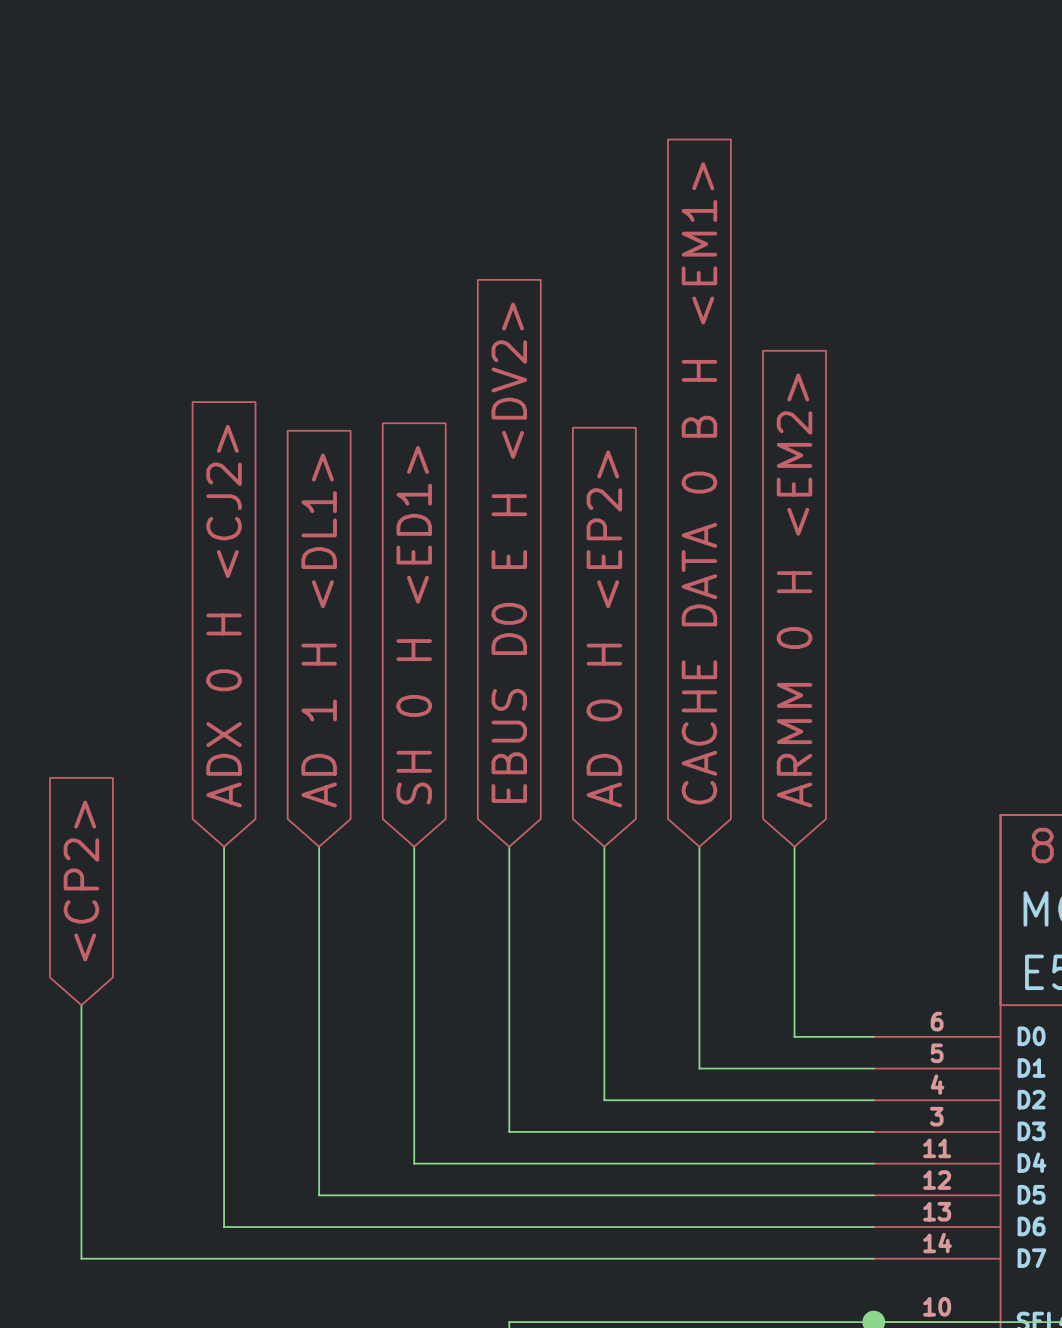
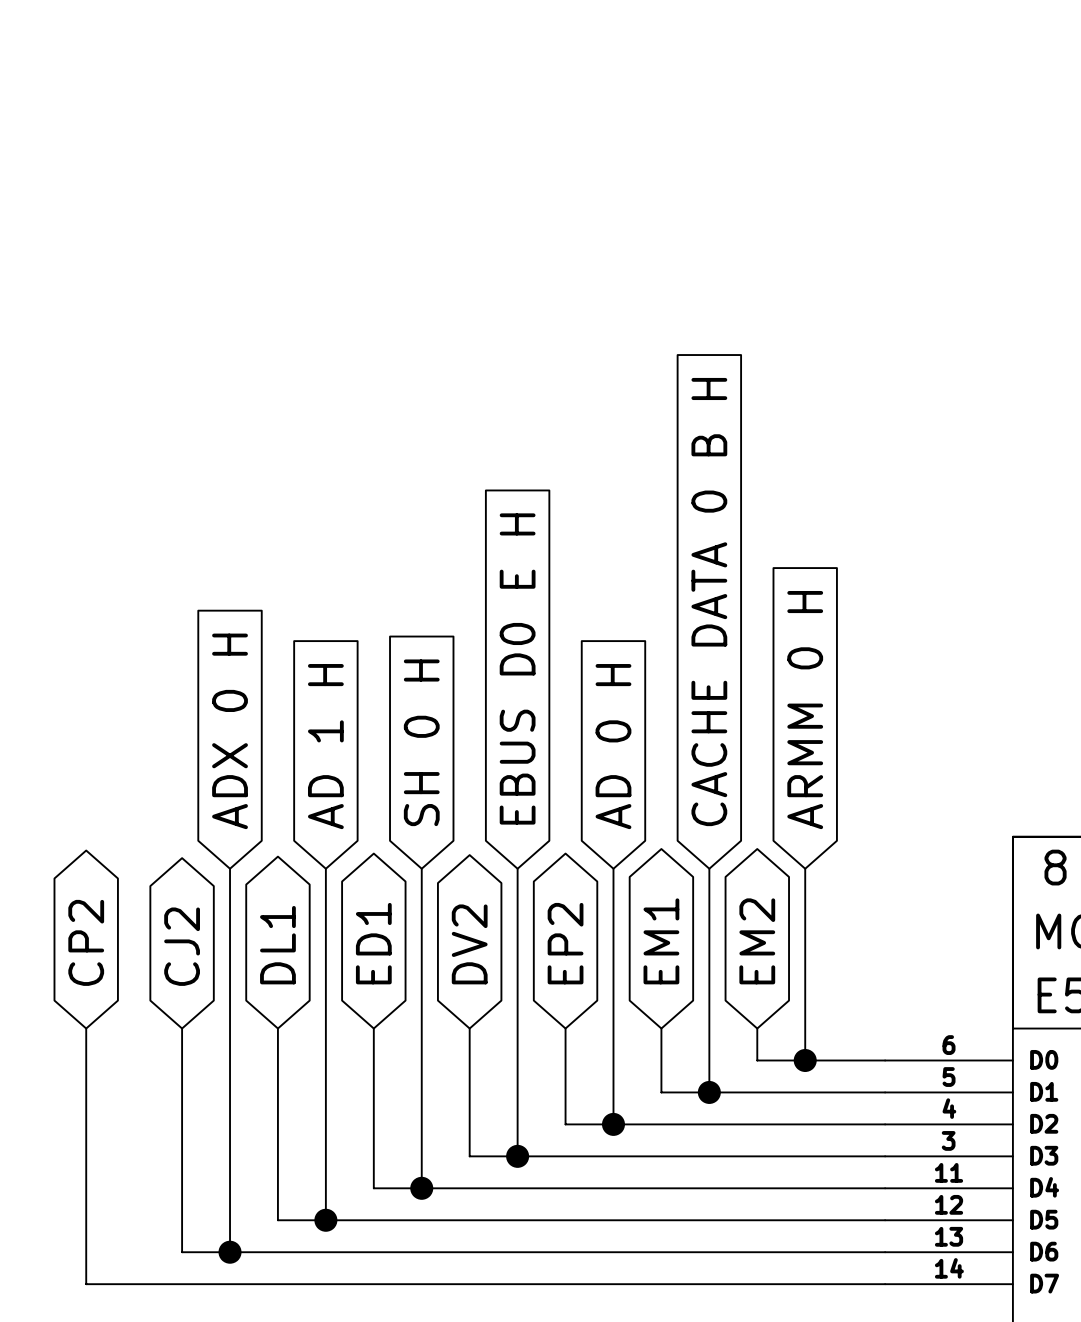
global label: CACHE DATA 0 B H <EM1> (699, 483) -> CACHE DATA 0 B H (709, 602)
global label: EBUS D0 E H <DV2> (509, 552) -> EBUS D0 E H (517, 668)
global label: ARMM 0 H <EM2> (794, 590) -> ARMM 0 H (805, 710)
global label: ADX 0 H <CJ2> (224, 616) -> ADX 0 H (230, 731)
global label: SH 0 H <ED1> (414, 625) -> SH 0 H (421, 742)
global label: AD 0 H <EP2> (604, 628) -> AD 0 H (613, 746)
global label: AD 1 H <DL1> (319, 630) -> AD 1 H (325, 746)
global label shape: input (81, 881) -> bidirectional (86, 942)
global label: <CP2> (81, 881) -> CP2 (86, 942)
global label: none -> EM1 (661, 941)
global label: none -> EM2 (757, 941)
global label: none -> ED1 (373, 943)
global label: none -> EP2 (565, 943)
global label: none -> DV2 (469, 944)
global label: none -> DL1 (277, 945)
global label: none -> CJ2 (182, 946)
wire: none -> (182, 1028) (182, 1252) (230, 1252)
wire: none -> (277, 1028) (277, 1220) (325, 1220)
wire: none -> (373, 1028) (373, 1188) (421, 1188)
wire: none -> (469, 1028) (469, 1156) (517, 1156)
wire: none -> (565, 1028) (565, 1124) (613, 1124)
wire: none -> (661, 1028) (661, 1092) (709, 1092)
wire: none -> (757, 1028) (757, 1060) (805, 1060)
junction: none -> (805, 1060)
junction: none -> (709, 1092)
junction: none -> (613, 1124)
junction: none -> (517, 1156)
junction: none -> (421, 1188)
junction: none -> (325, 1220)
junction: none -> (230, 1252)

